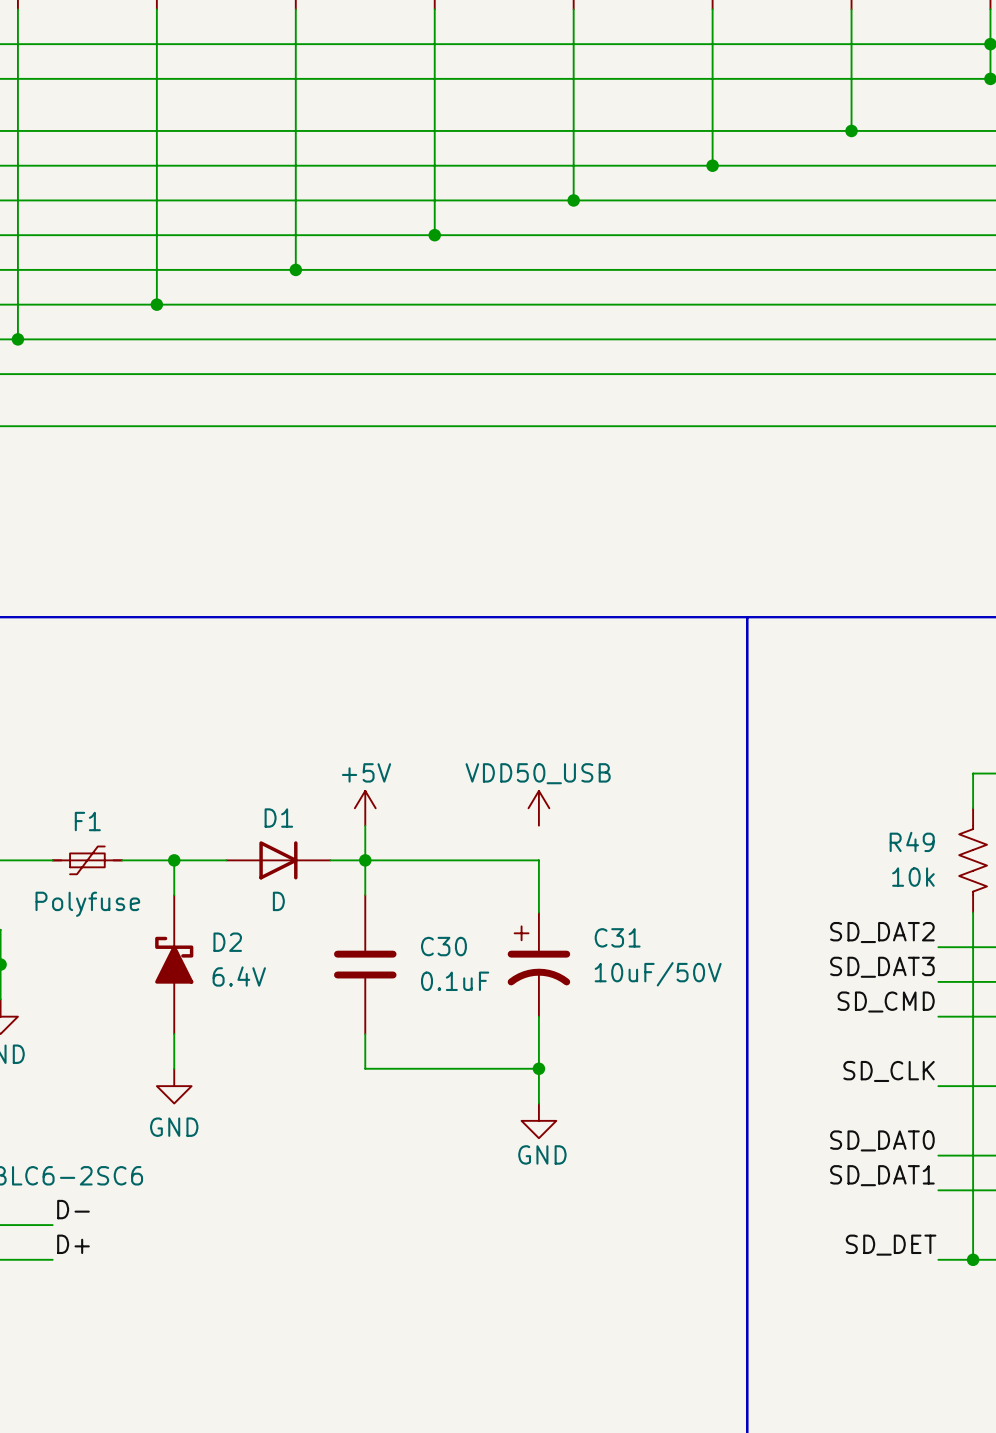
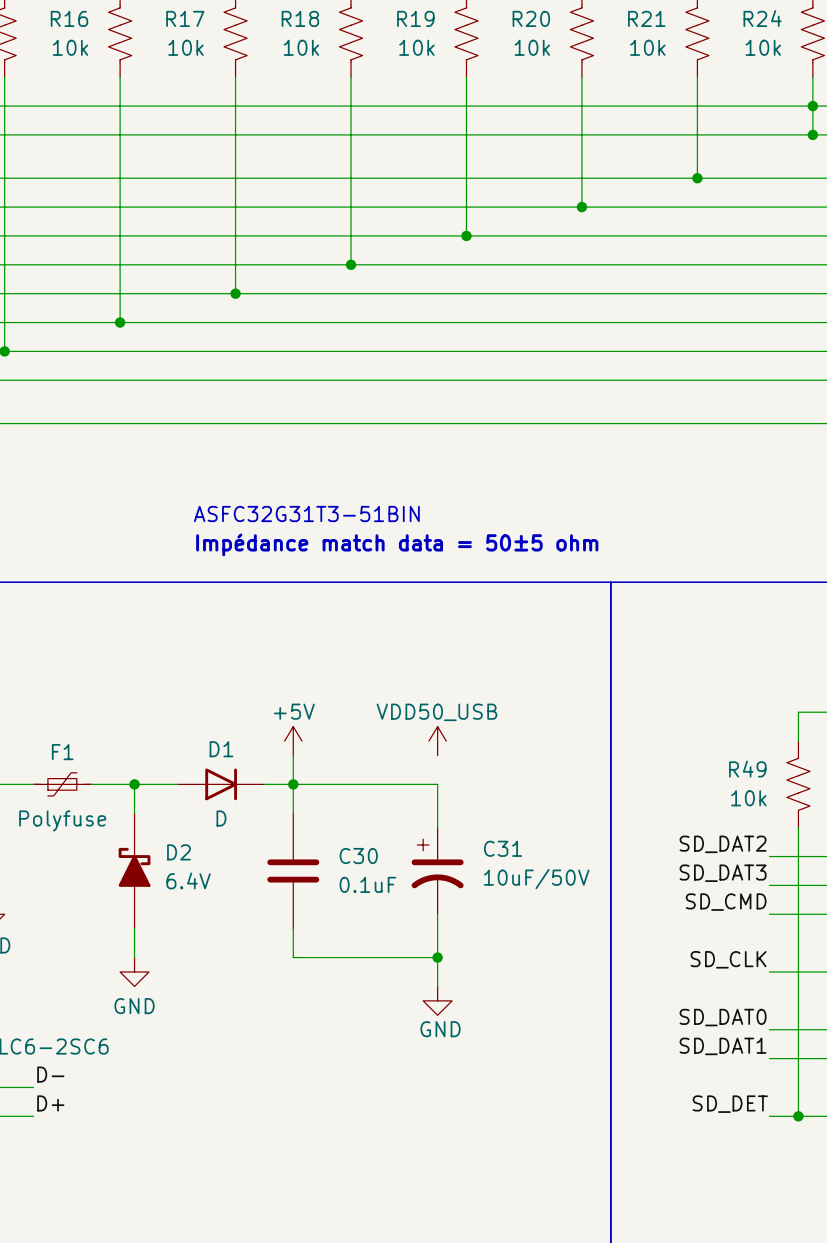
text: none -> ASFC32G31T3-51BIN (306, 514)
text: none -> Impédance match data = 50±5 ohm (397, 544)

